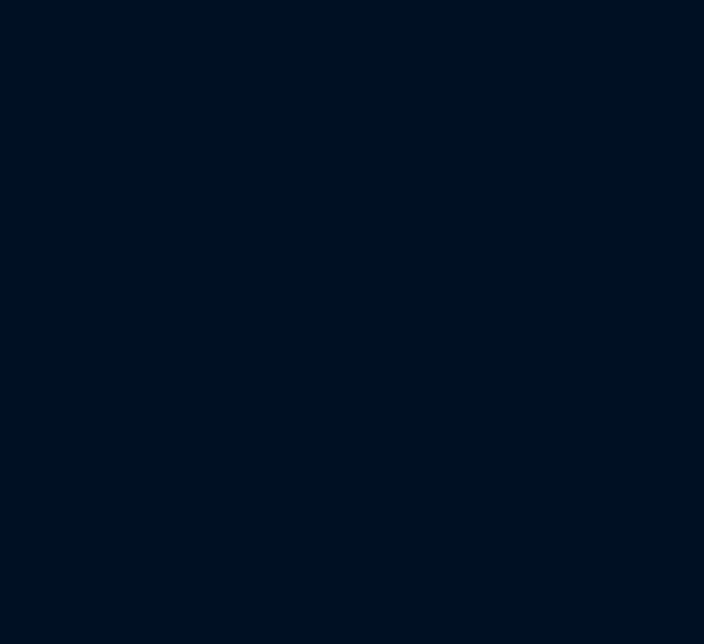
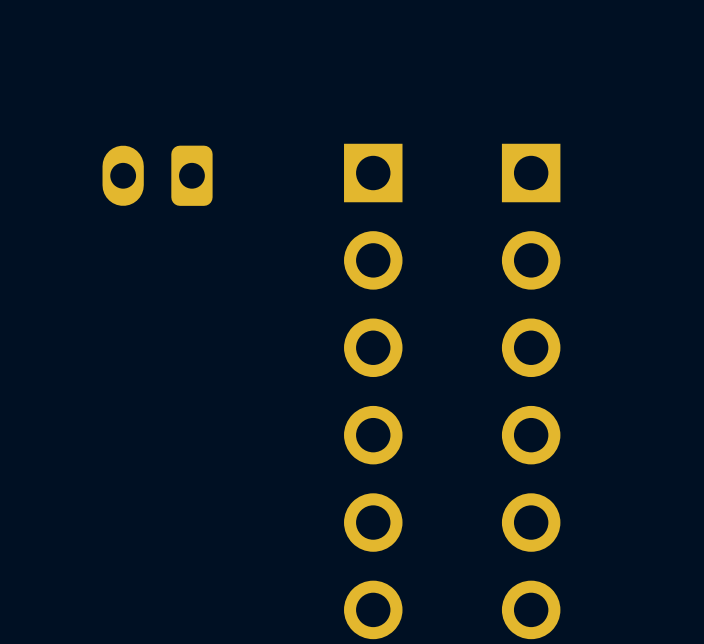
part: none -> (157, 175)
part: none -> (373, 391)
part: none -> (531, 391)

